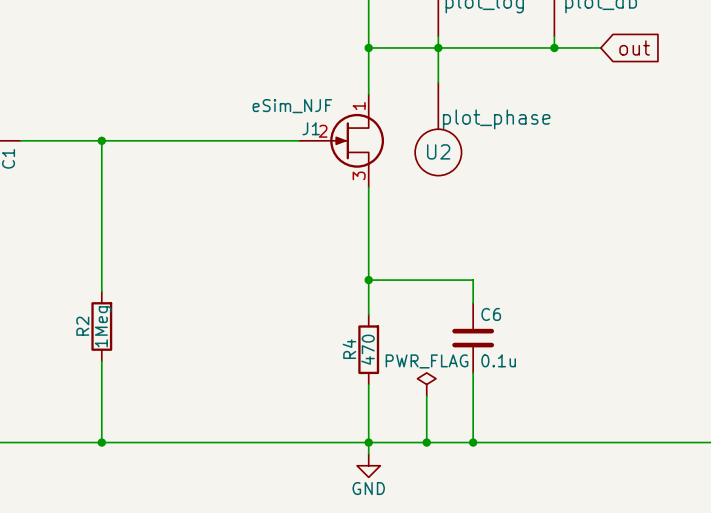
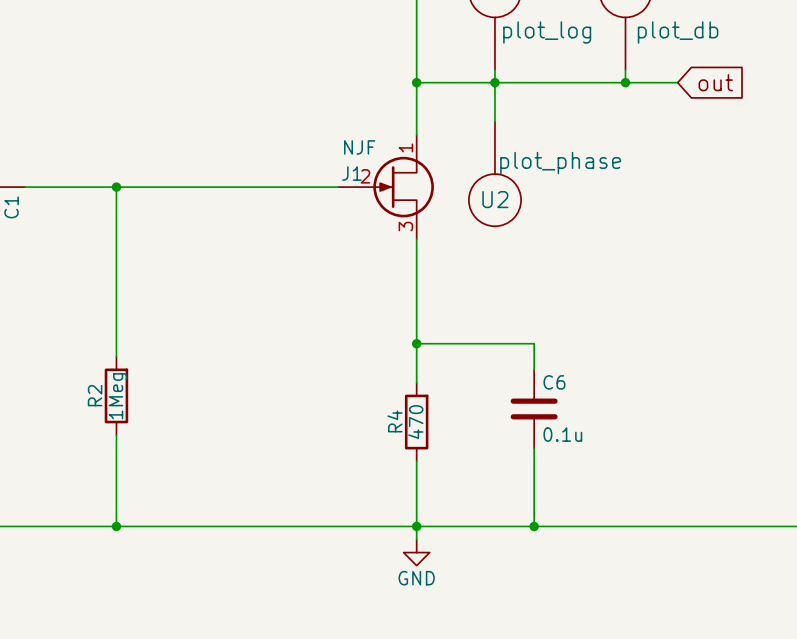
J1 value: eSim_NJF (292, 106) -> NJF (359, 147)
power symbol: PWR_FLAG (426, 384) -> none
wire: (426, 396) (426, 442) -> none
junction: (426, 442) -> none

